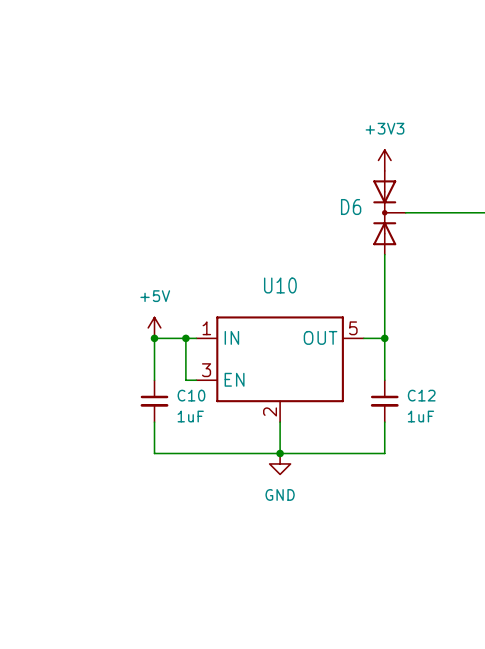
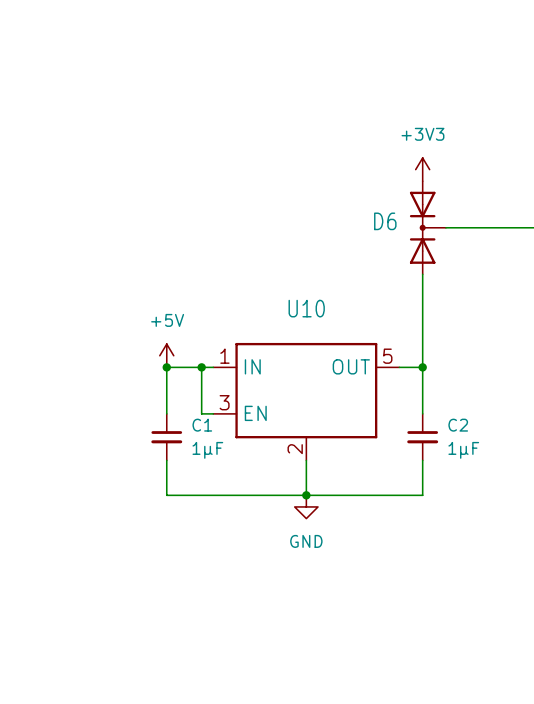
C10 name: C10 (191, 395) -> C1 (202, 425)
C12 name: C12 (421, 395) -> C2 (458, 425)
C10 value: 1uF (190, 416) -> 1μF (207, 450)
C12 value: 1uF (420, 416) -> 1μF (463, 450)

